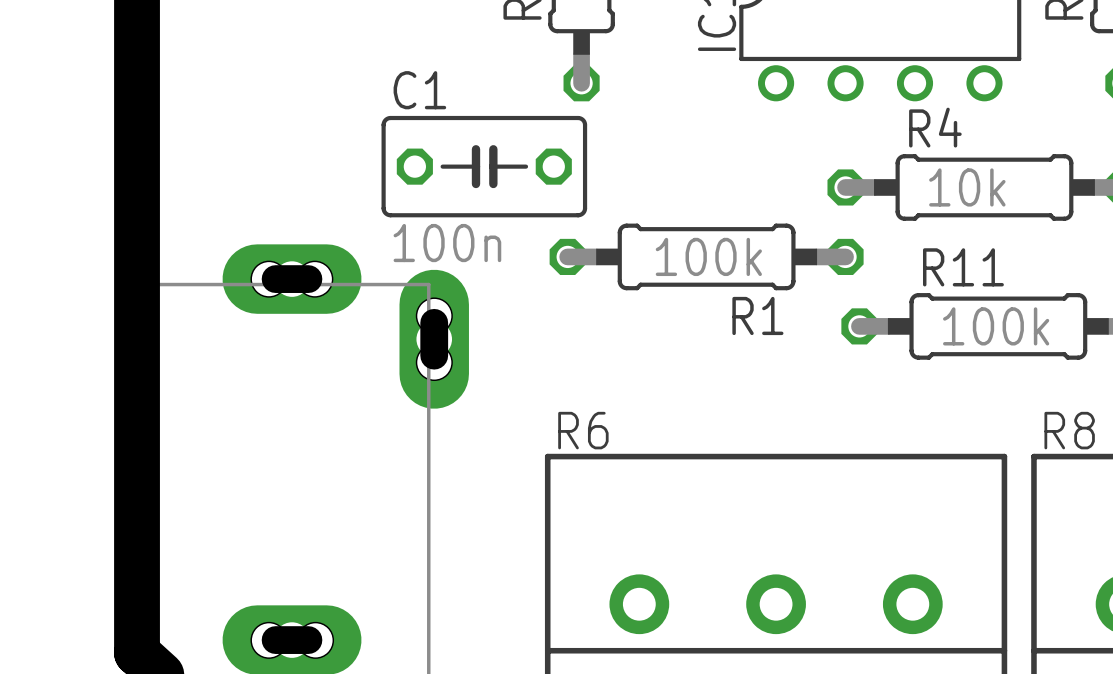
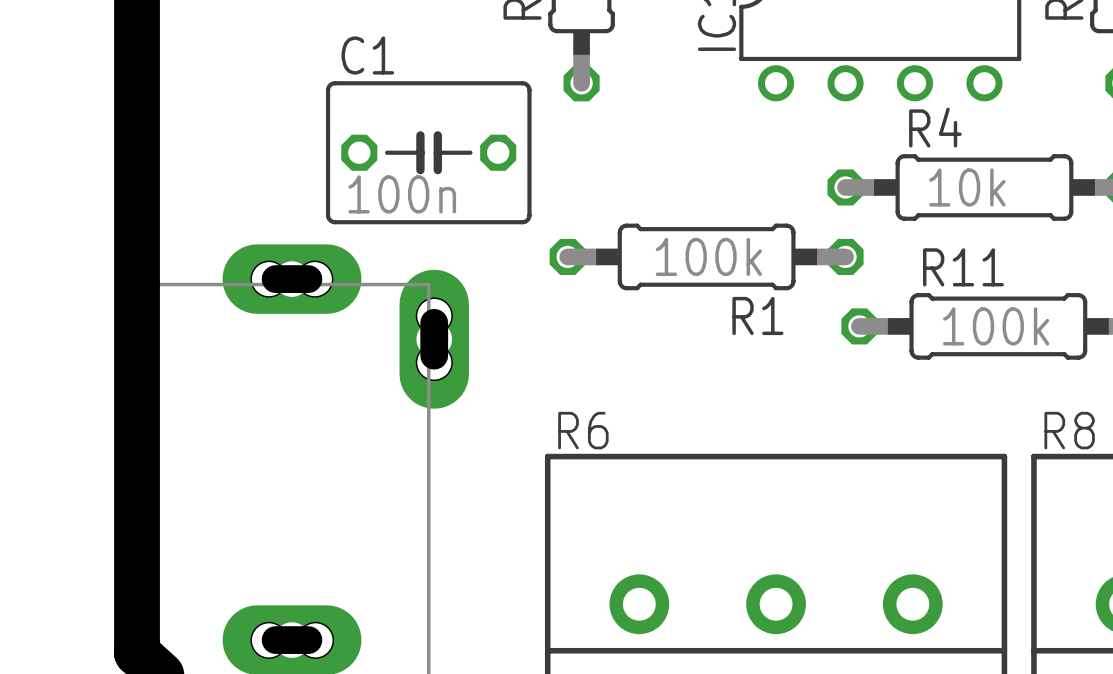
C1 footprint: [381, 115, 588, 218] -> [325, 81, 532, 225]

